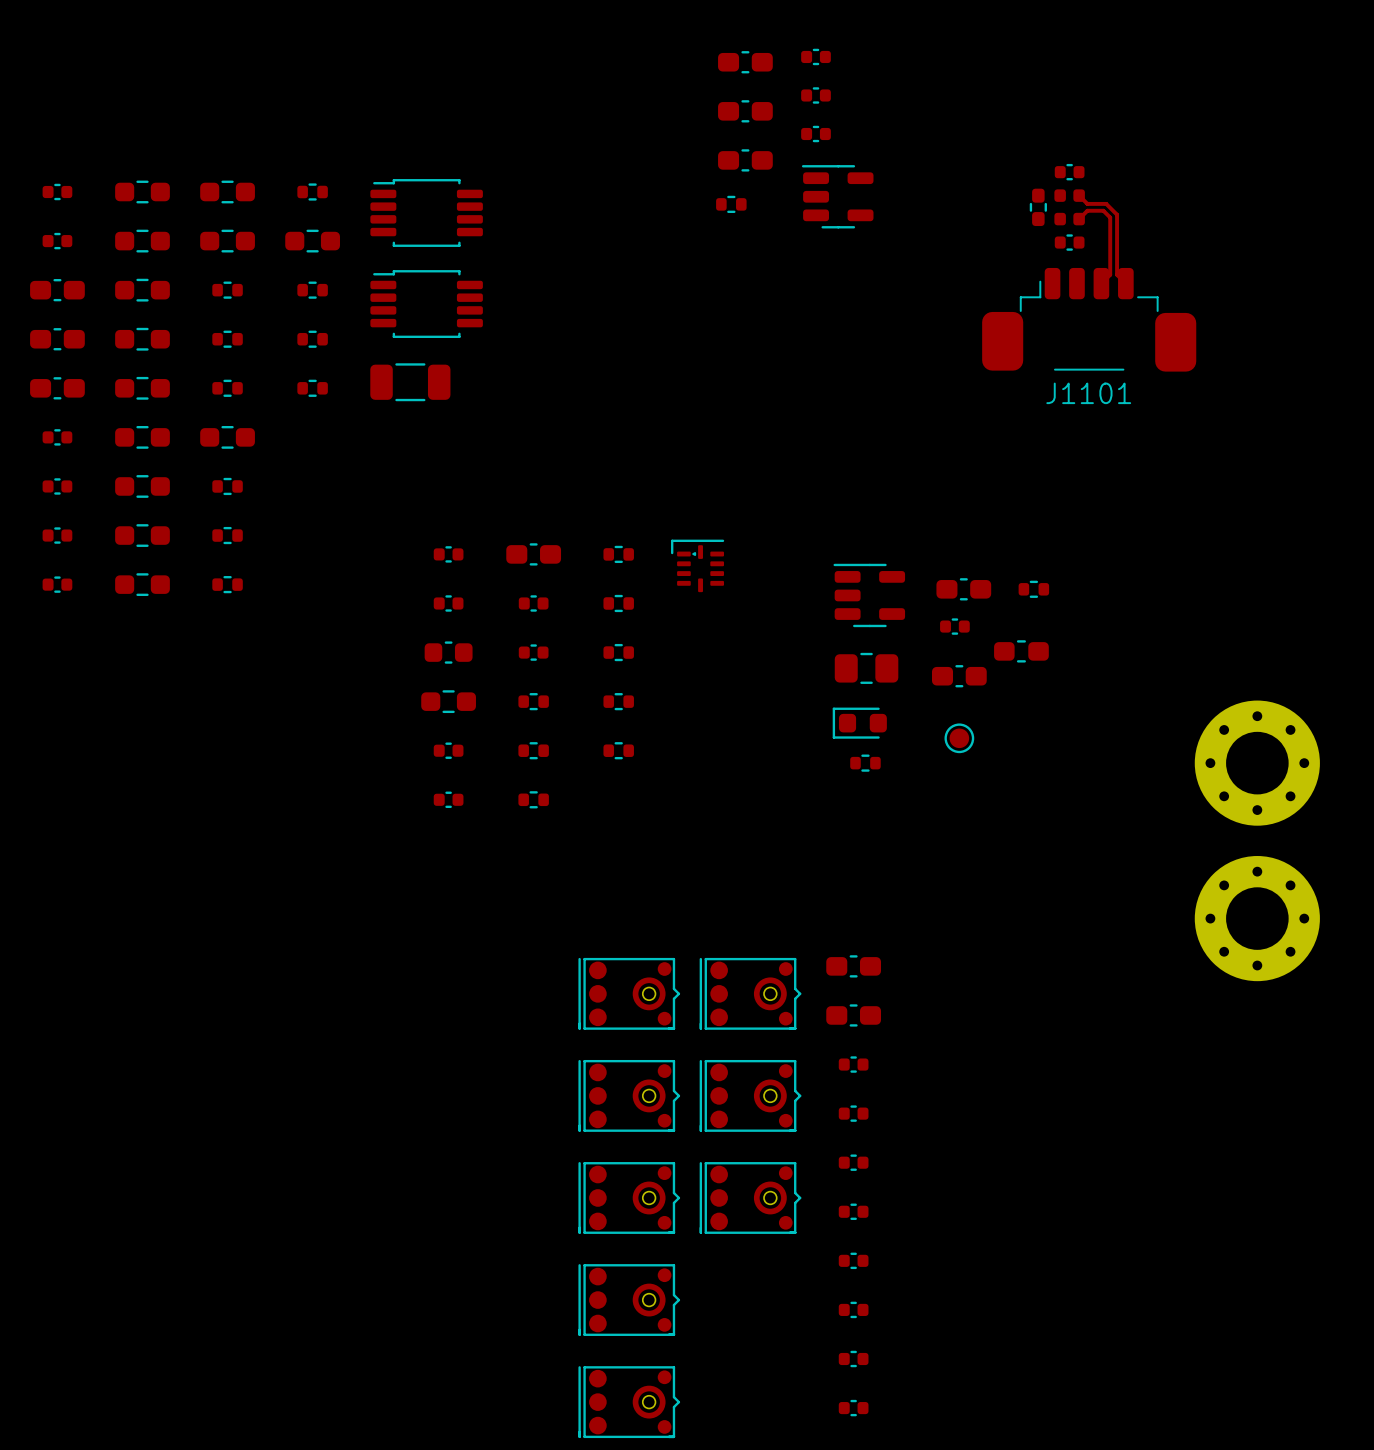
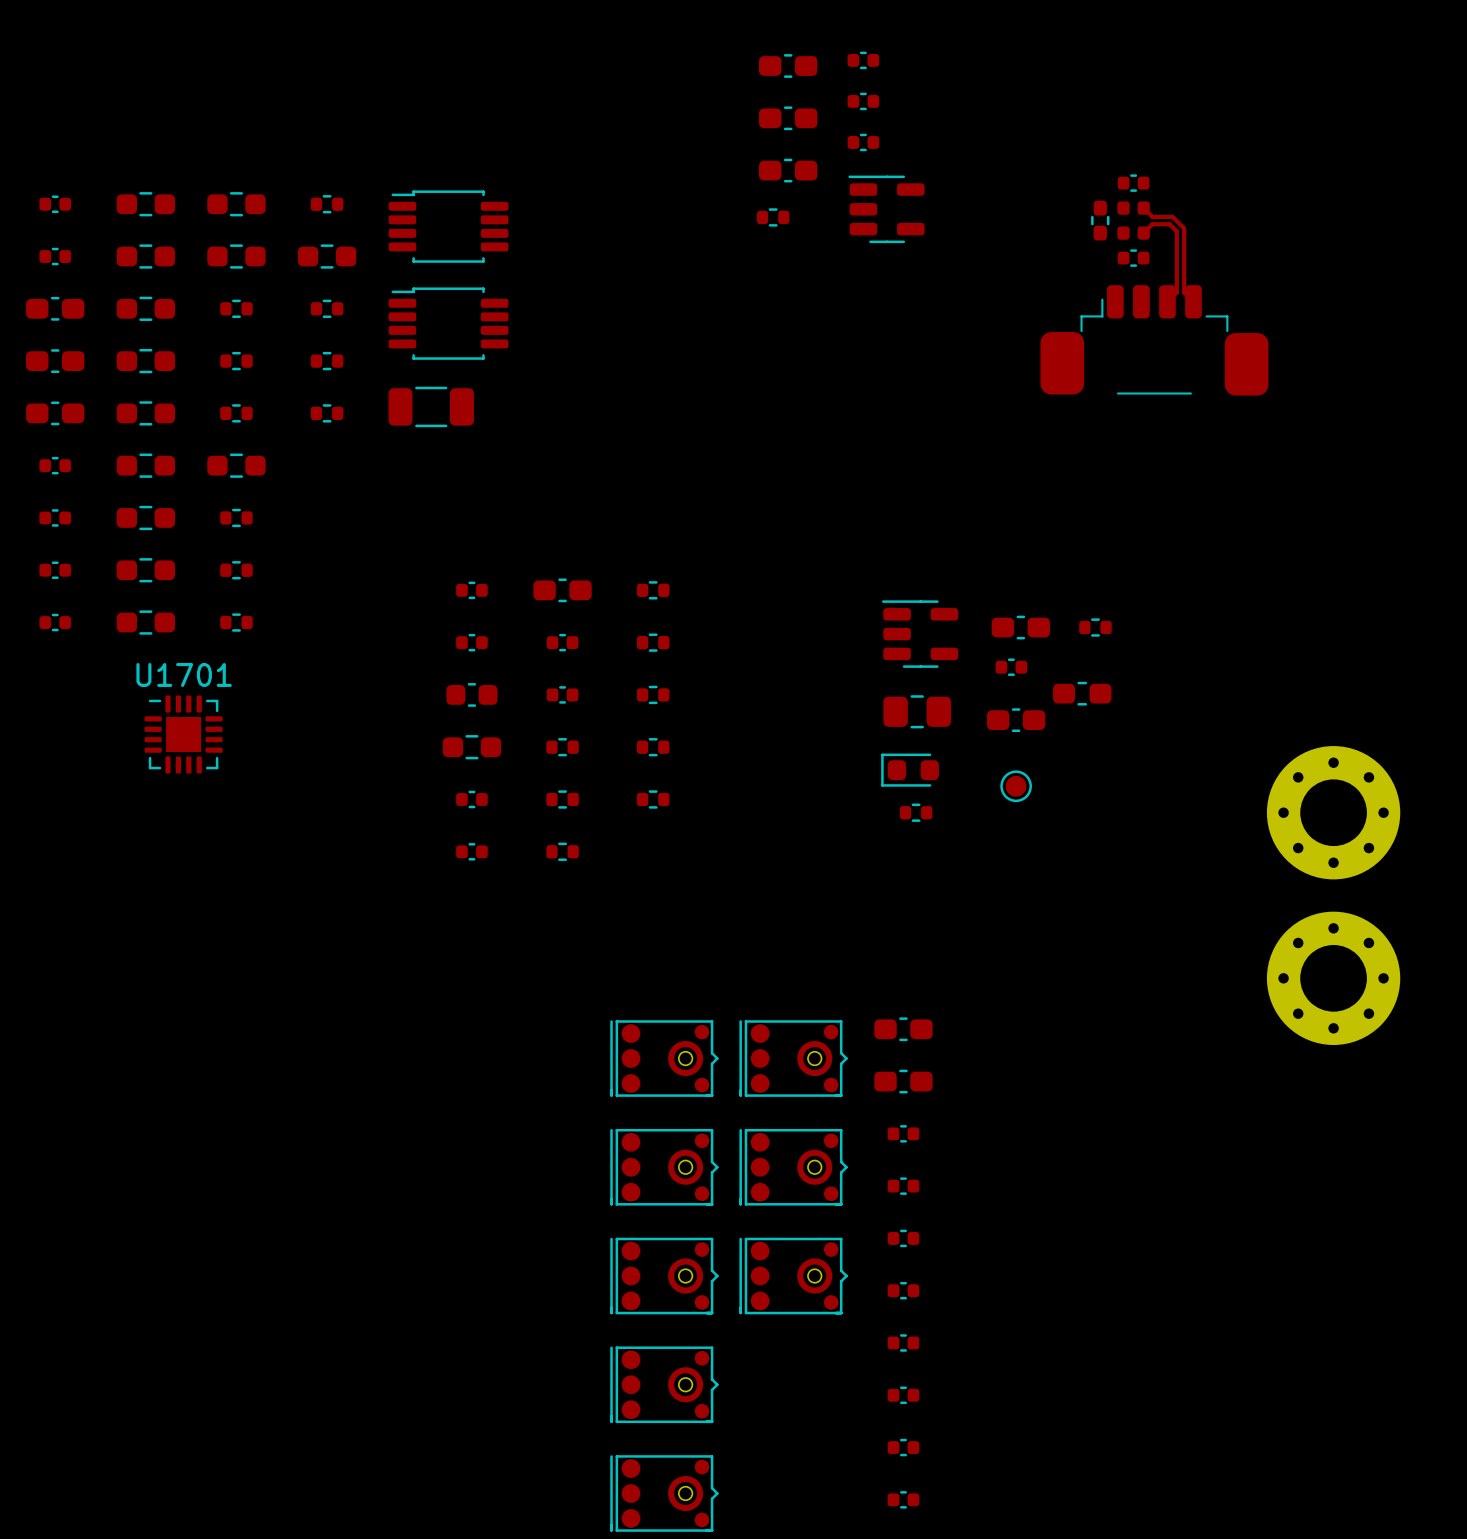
J1101 name: J1101 (1088, 393) -> none
part: (697, 565) -> none
U1701: none -> (183, 734)

